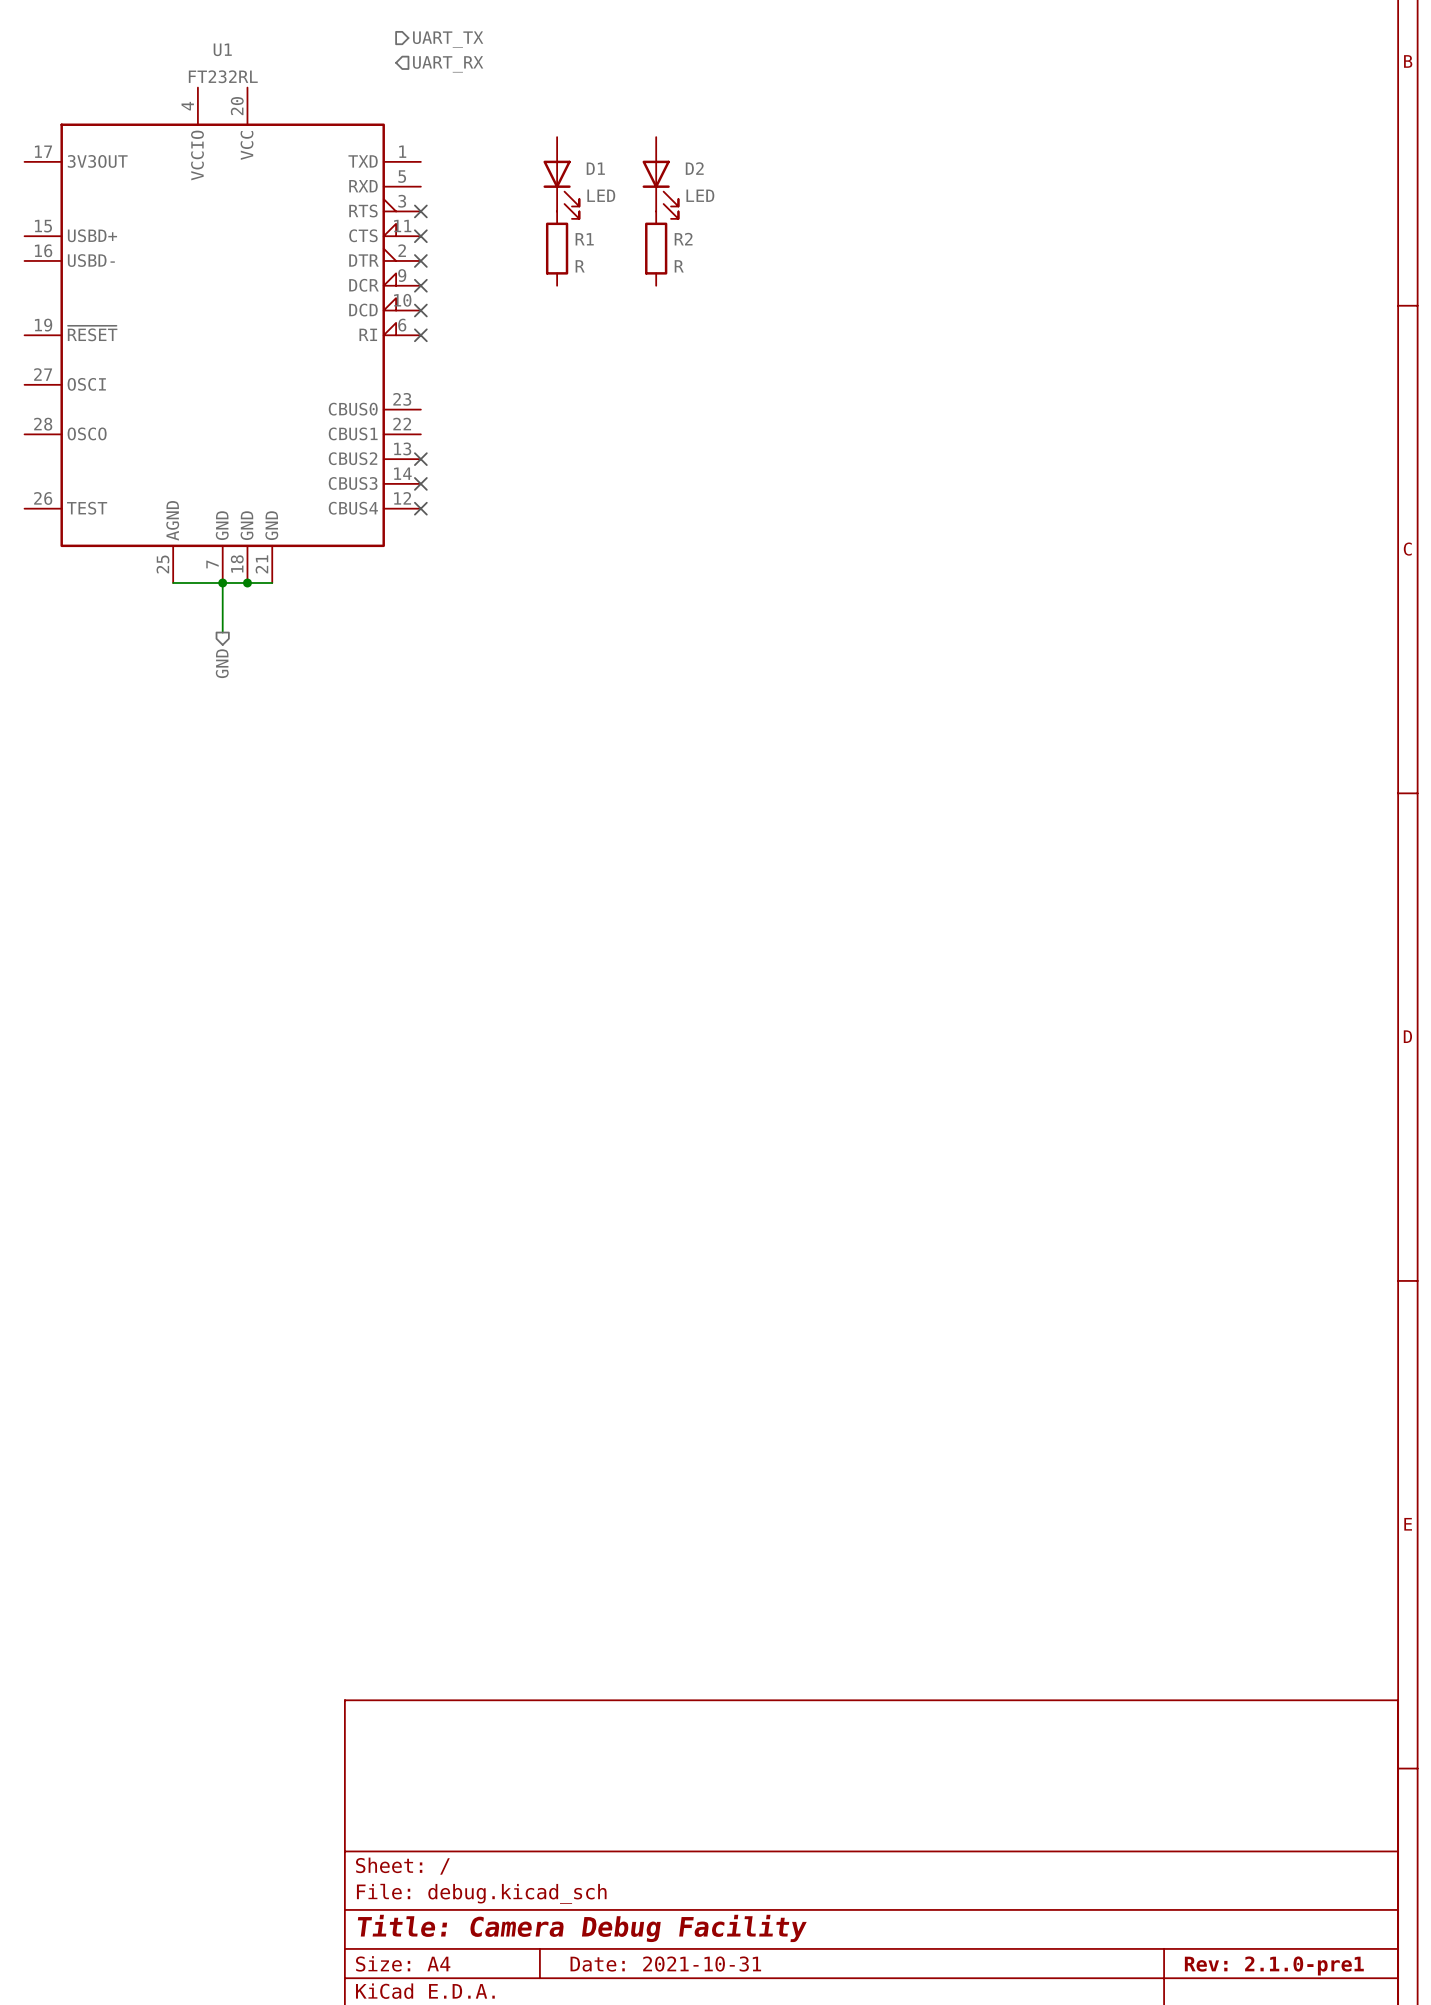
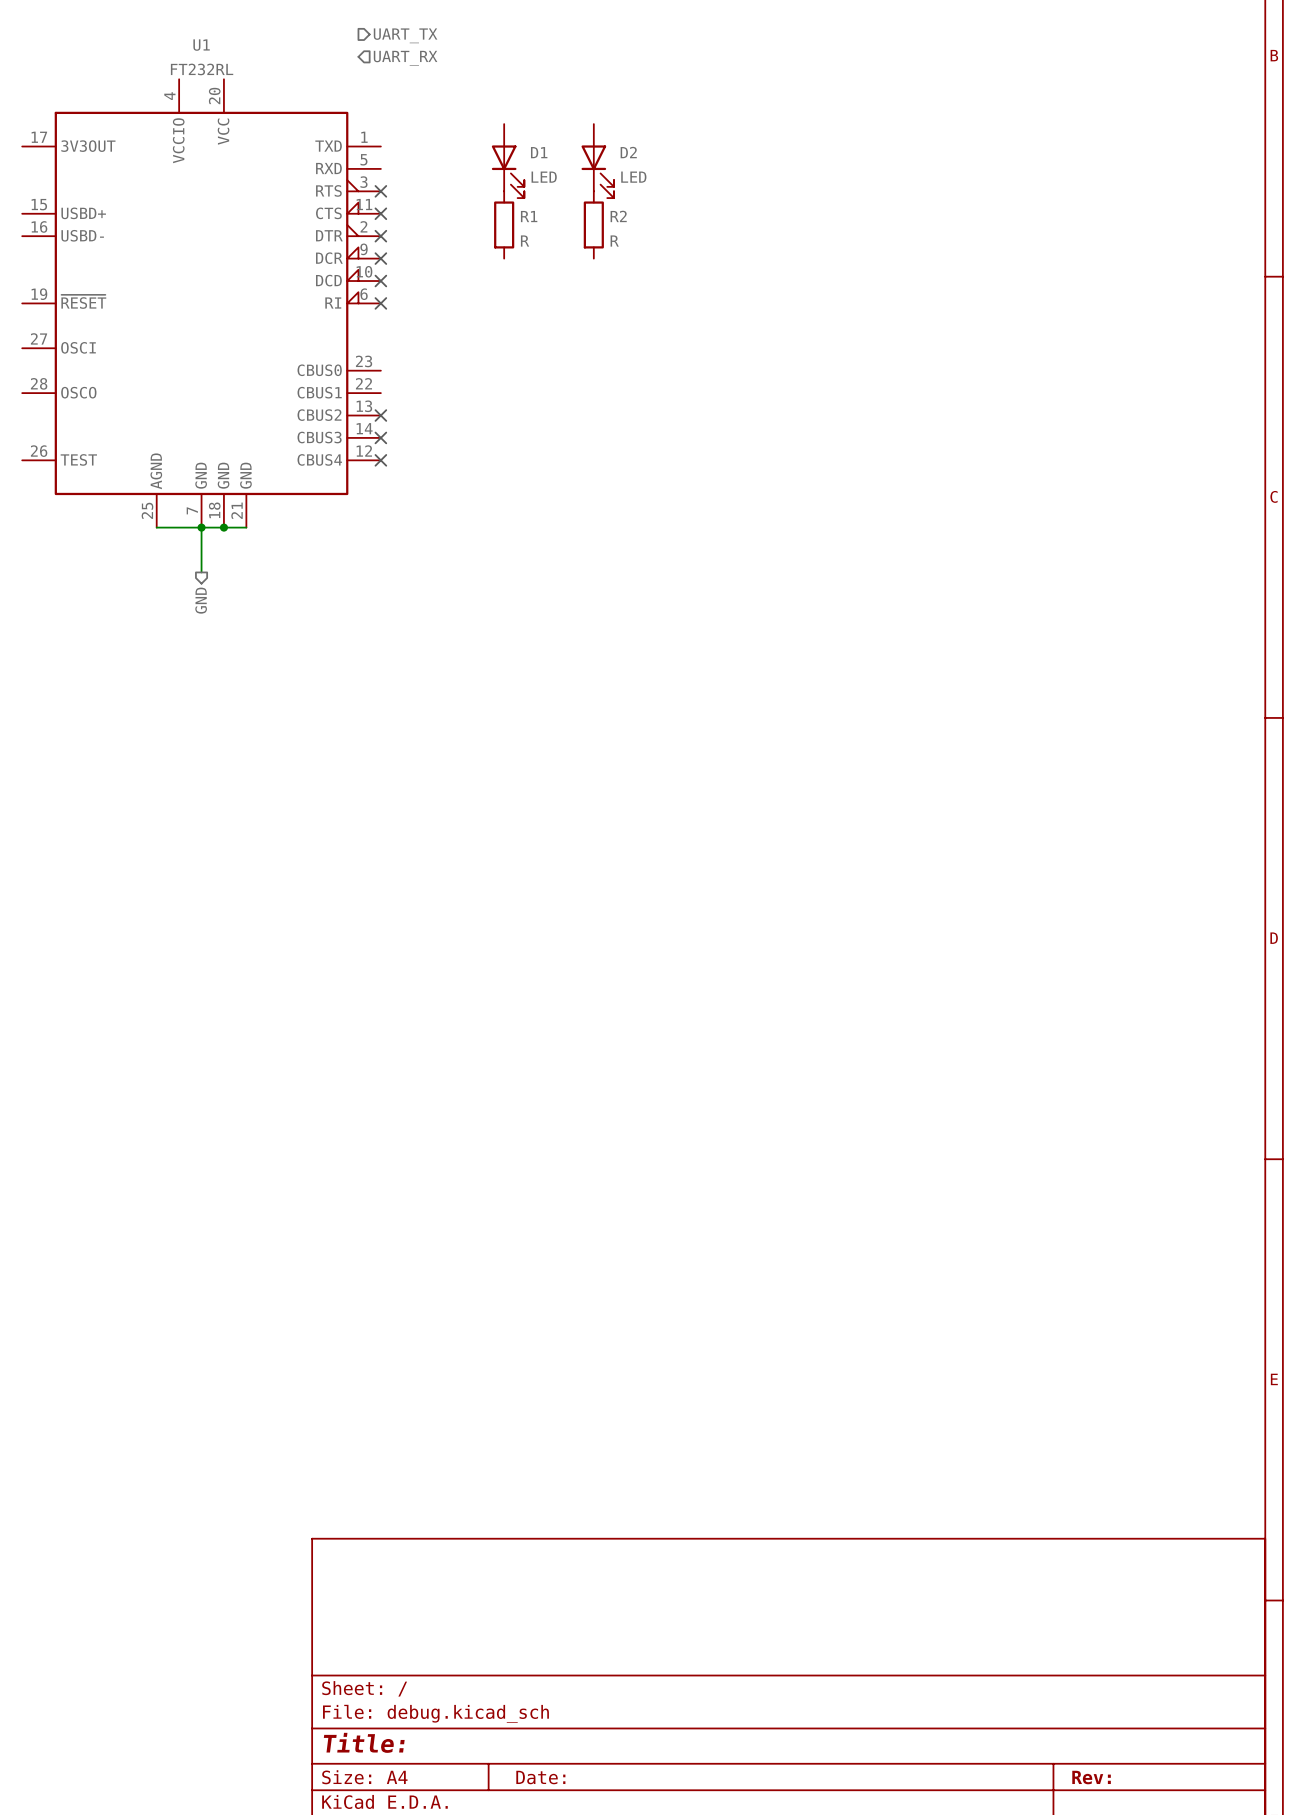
title block: Title: Camera Debug Facility (582, 1928) -> Title: (364, 1742)
title block: Date: 2021-10-31 (665, 1964) -> Date: (540, 1777)
title block: Rev: 2.1.0-pre1 (1274, 1965) -> Rev: (1091, 1777)

